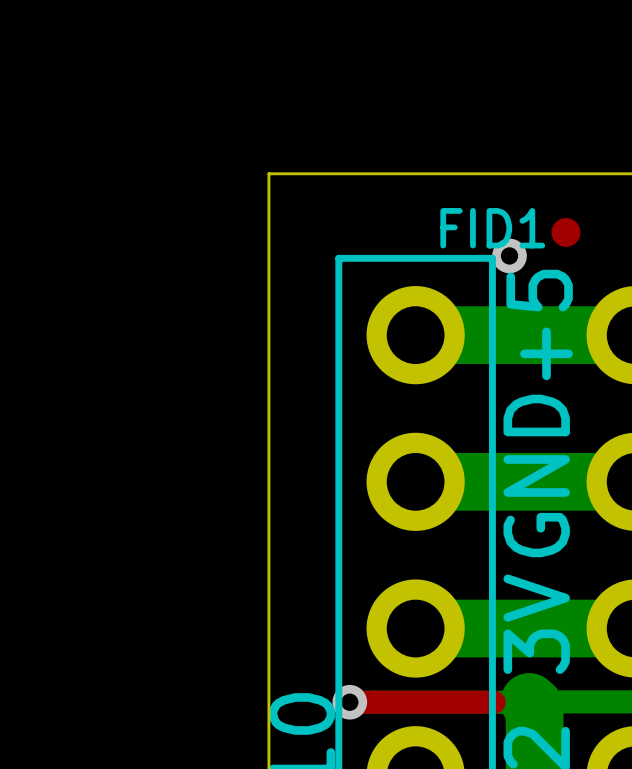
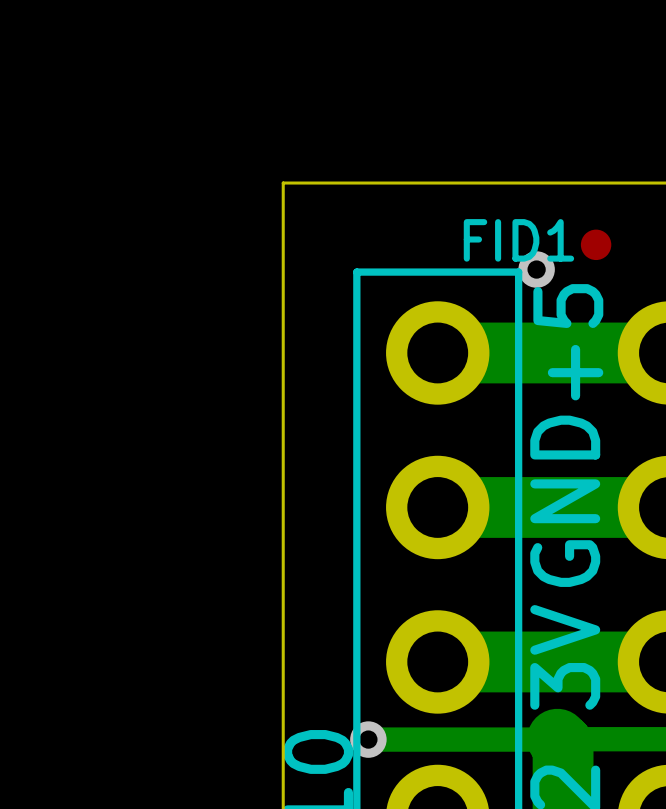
top track: (349, 702) (494, 702) -> none

